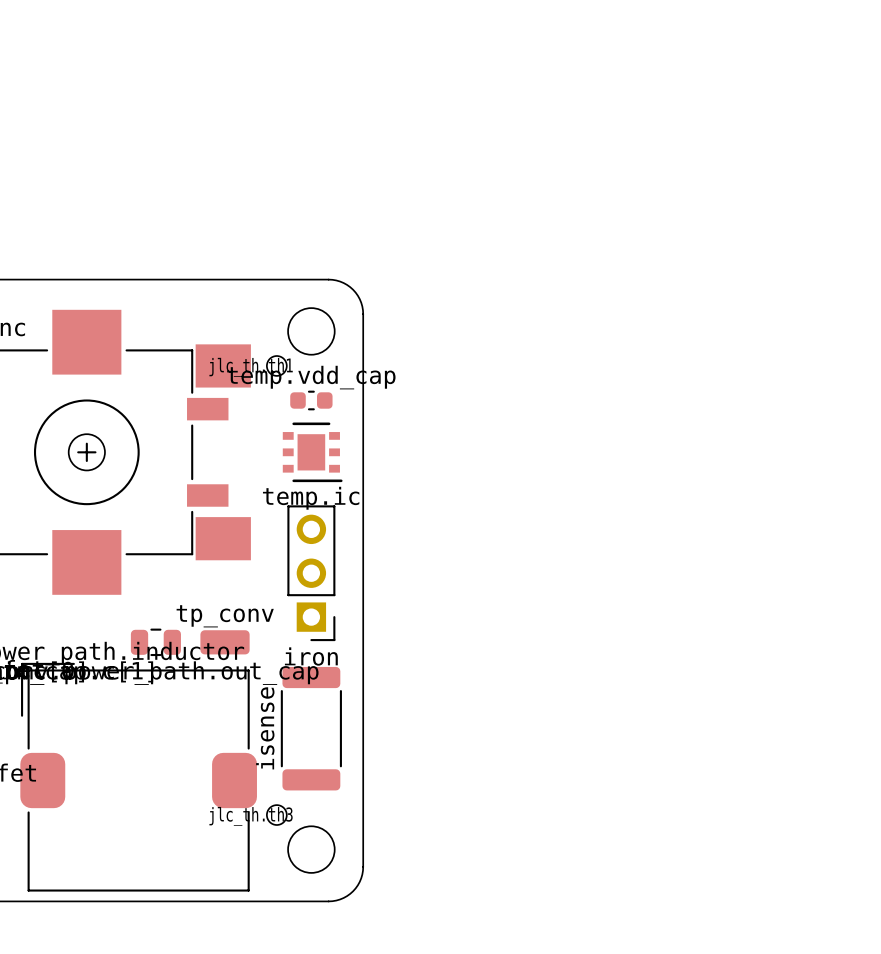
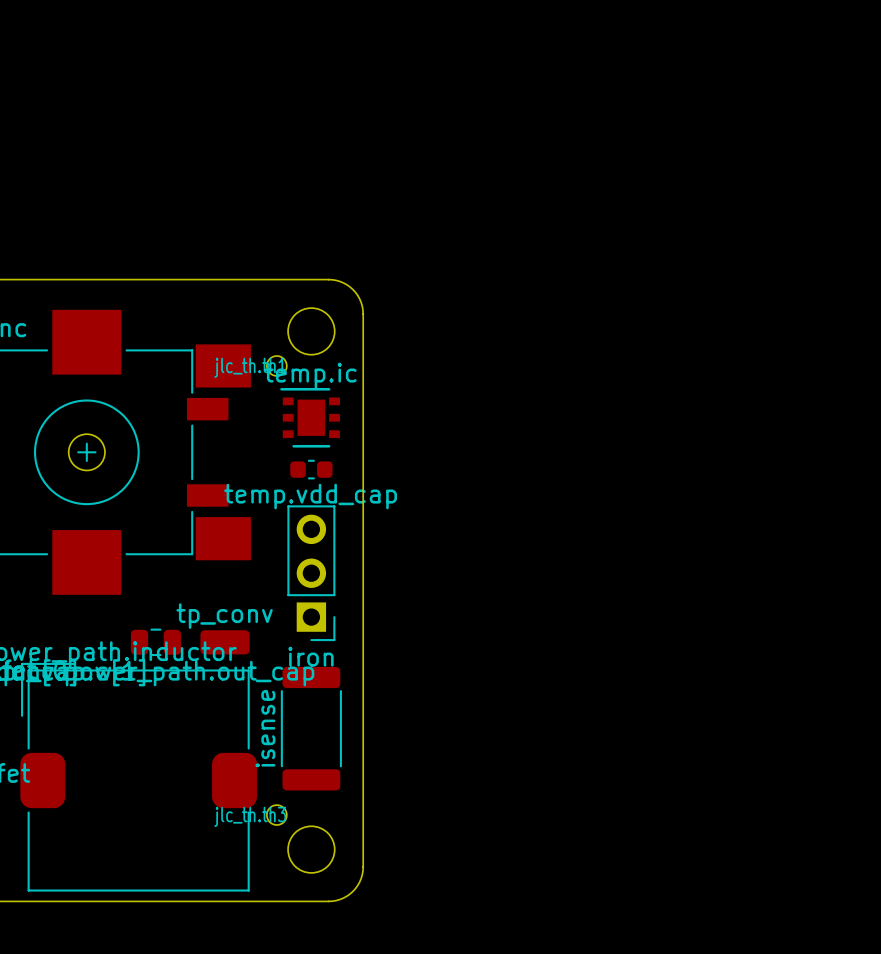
temp.vdd_cap name position: temp.vdd_cap (311, 377) -> temp.vdd_cap (310, 496)
temp.vdd_cap position: (311, 400) -> (311, 469)
temp.ic rotation: 0° (312, 452) -> 180° (310, 417)

